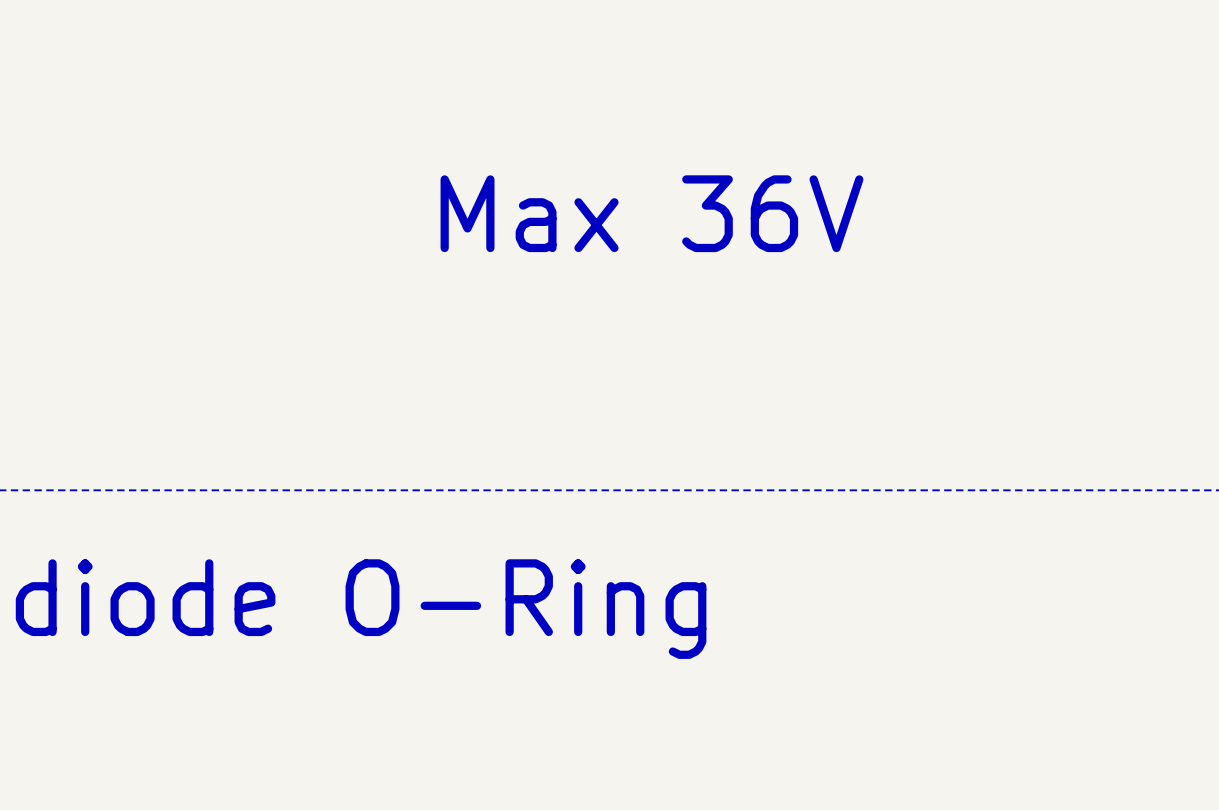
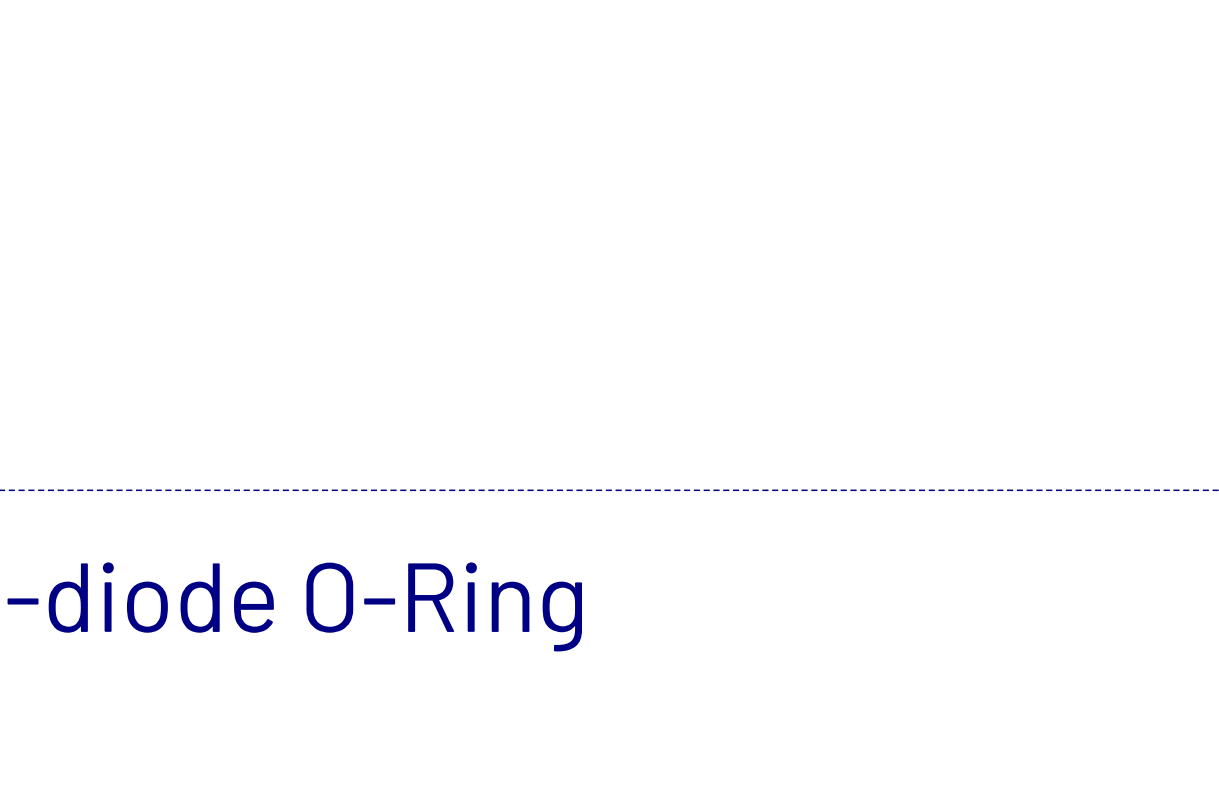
text: Max 36V (651, 213) -> none

